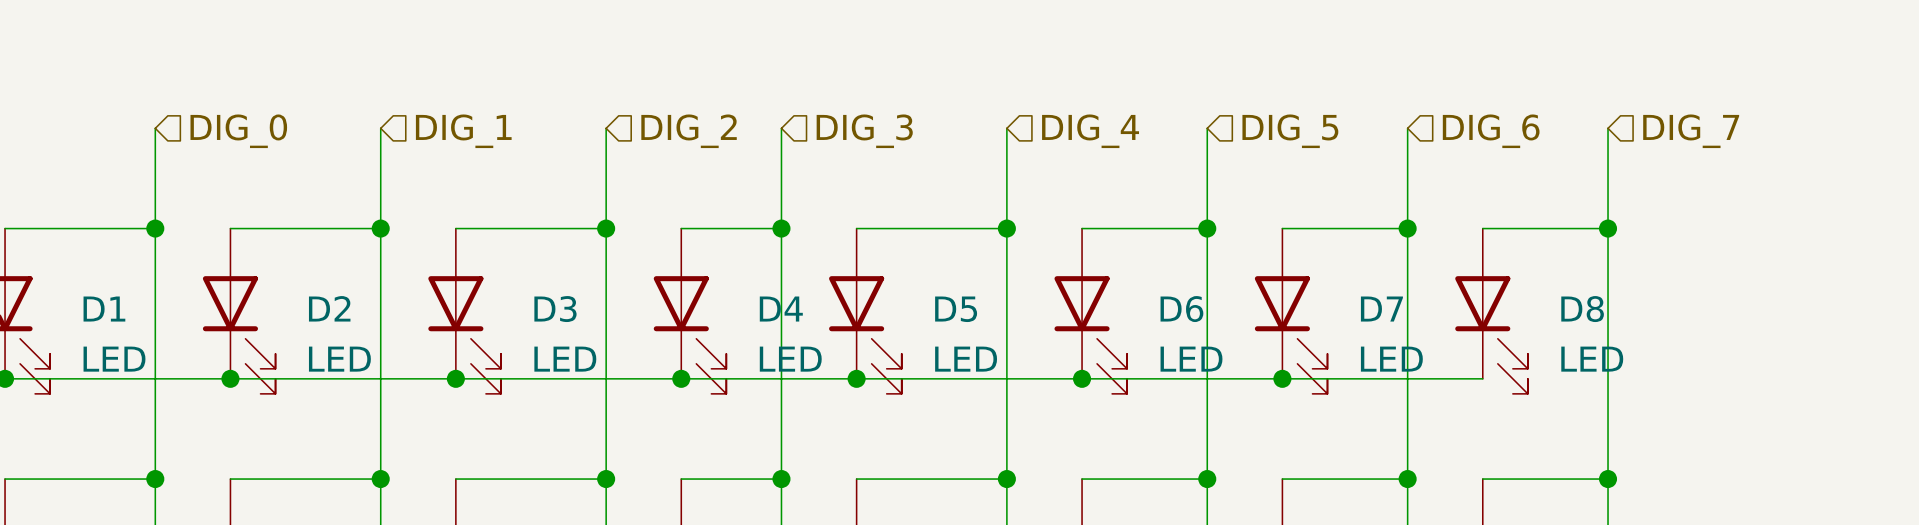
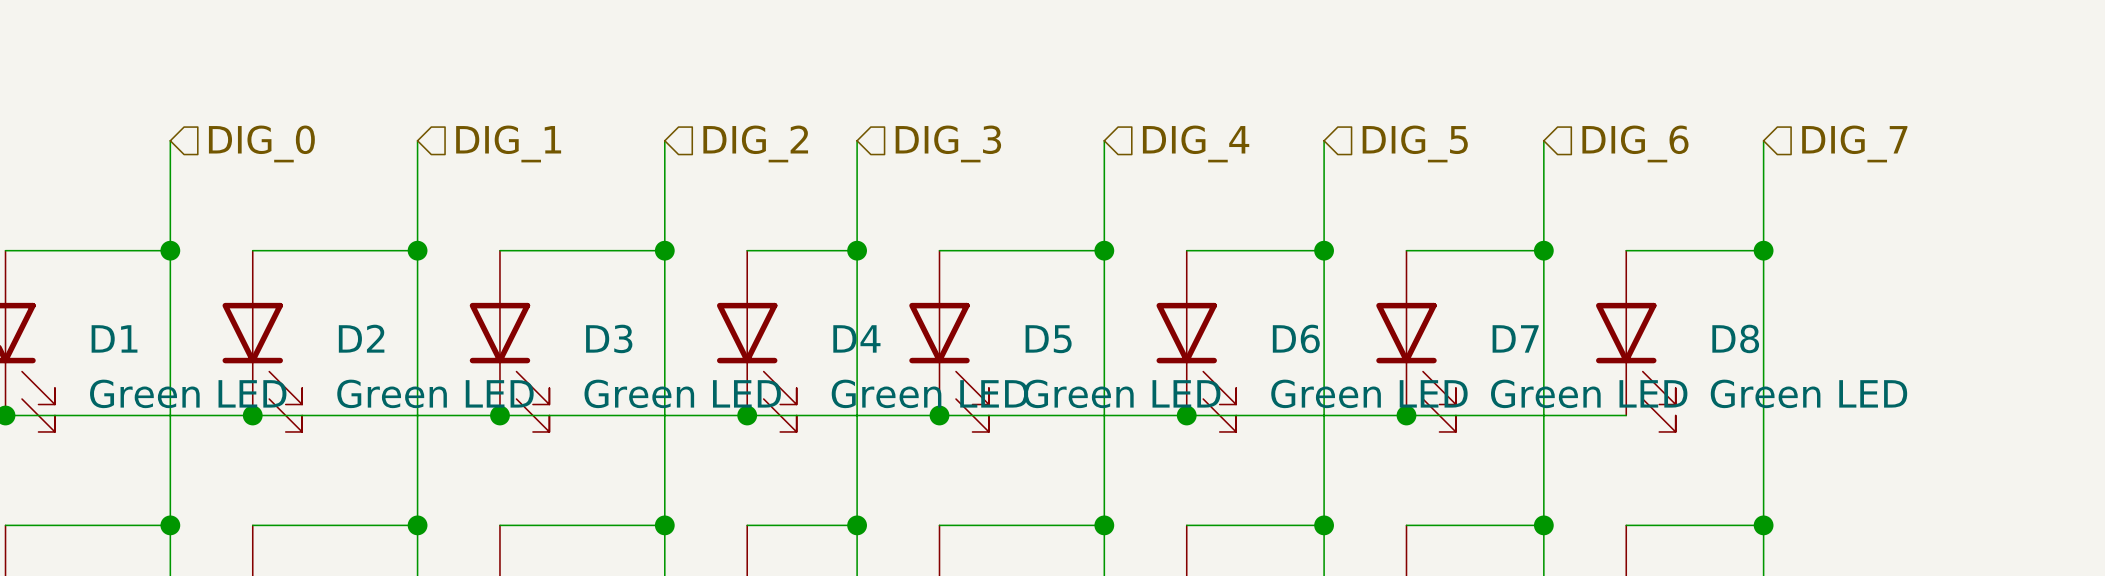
D1 value: LED (114, 359) -> Green LED (188, 393)
D2 value: LED (339, 359) -> Green LED (435, 393)
D3 value: LED (565, 359) -> Green LED (682, 393)
D4 value: LED (790, 359) -> Green LED (929, 393)
D5 value: LED (966, 359) -> Green LED (1122, 393)
D6 value: LED (1191, 359) -> Green LED (1369, 393)
D7 value: LED (1391, 359) -> Green LED (1589, 393)
D8 value: LED (1592, 359) -> Green LED (1808, 393)

